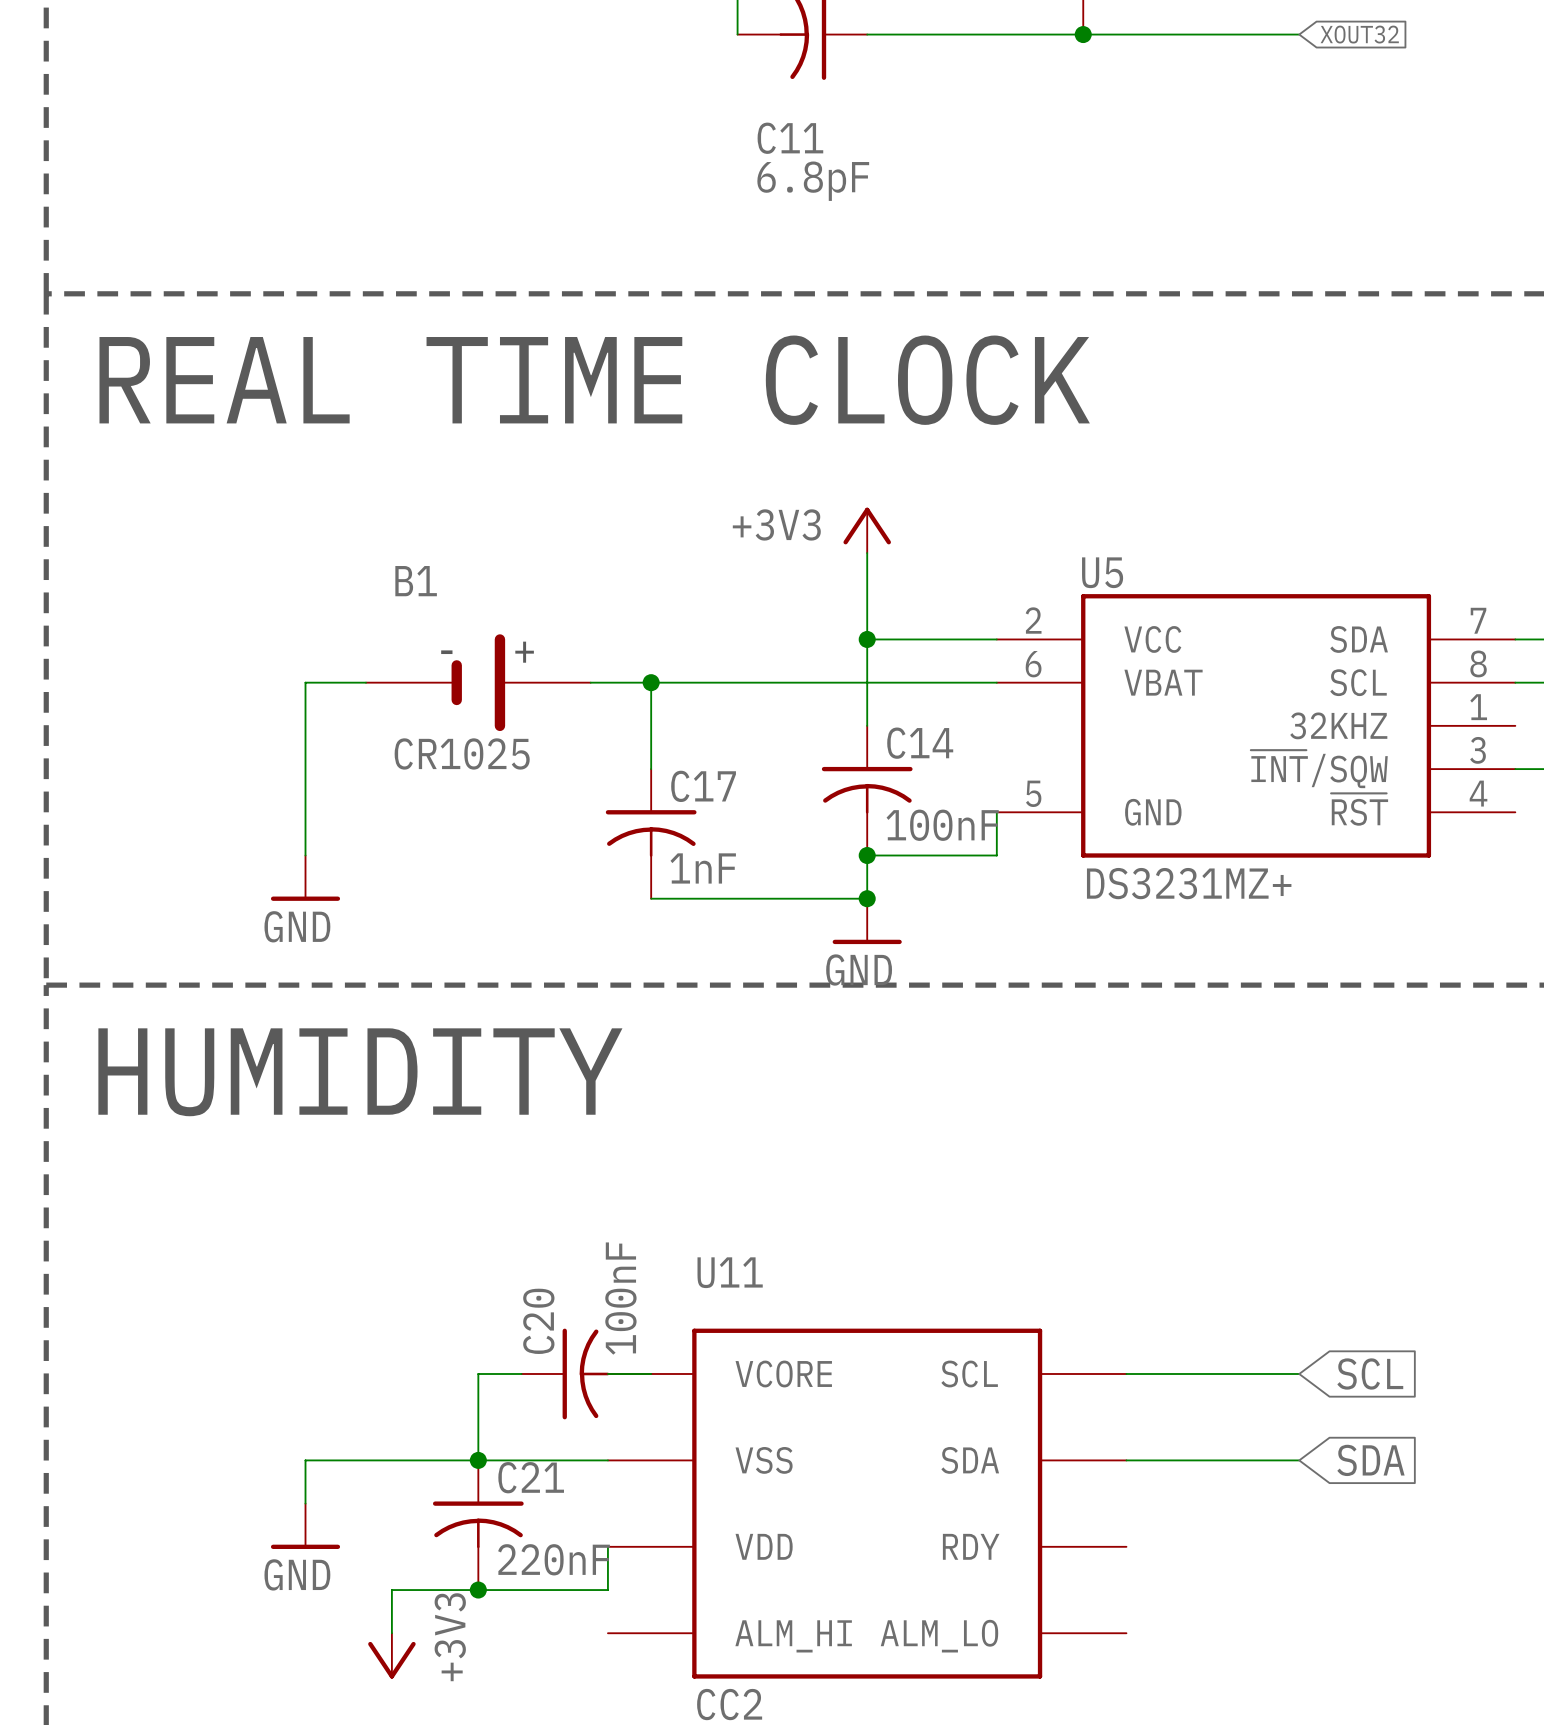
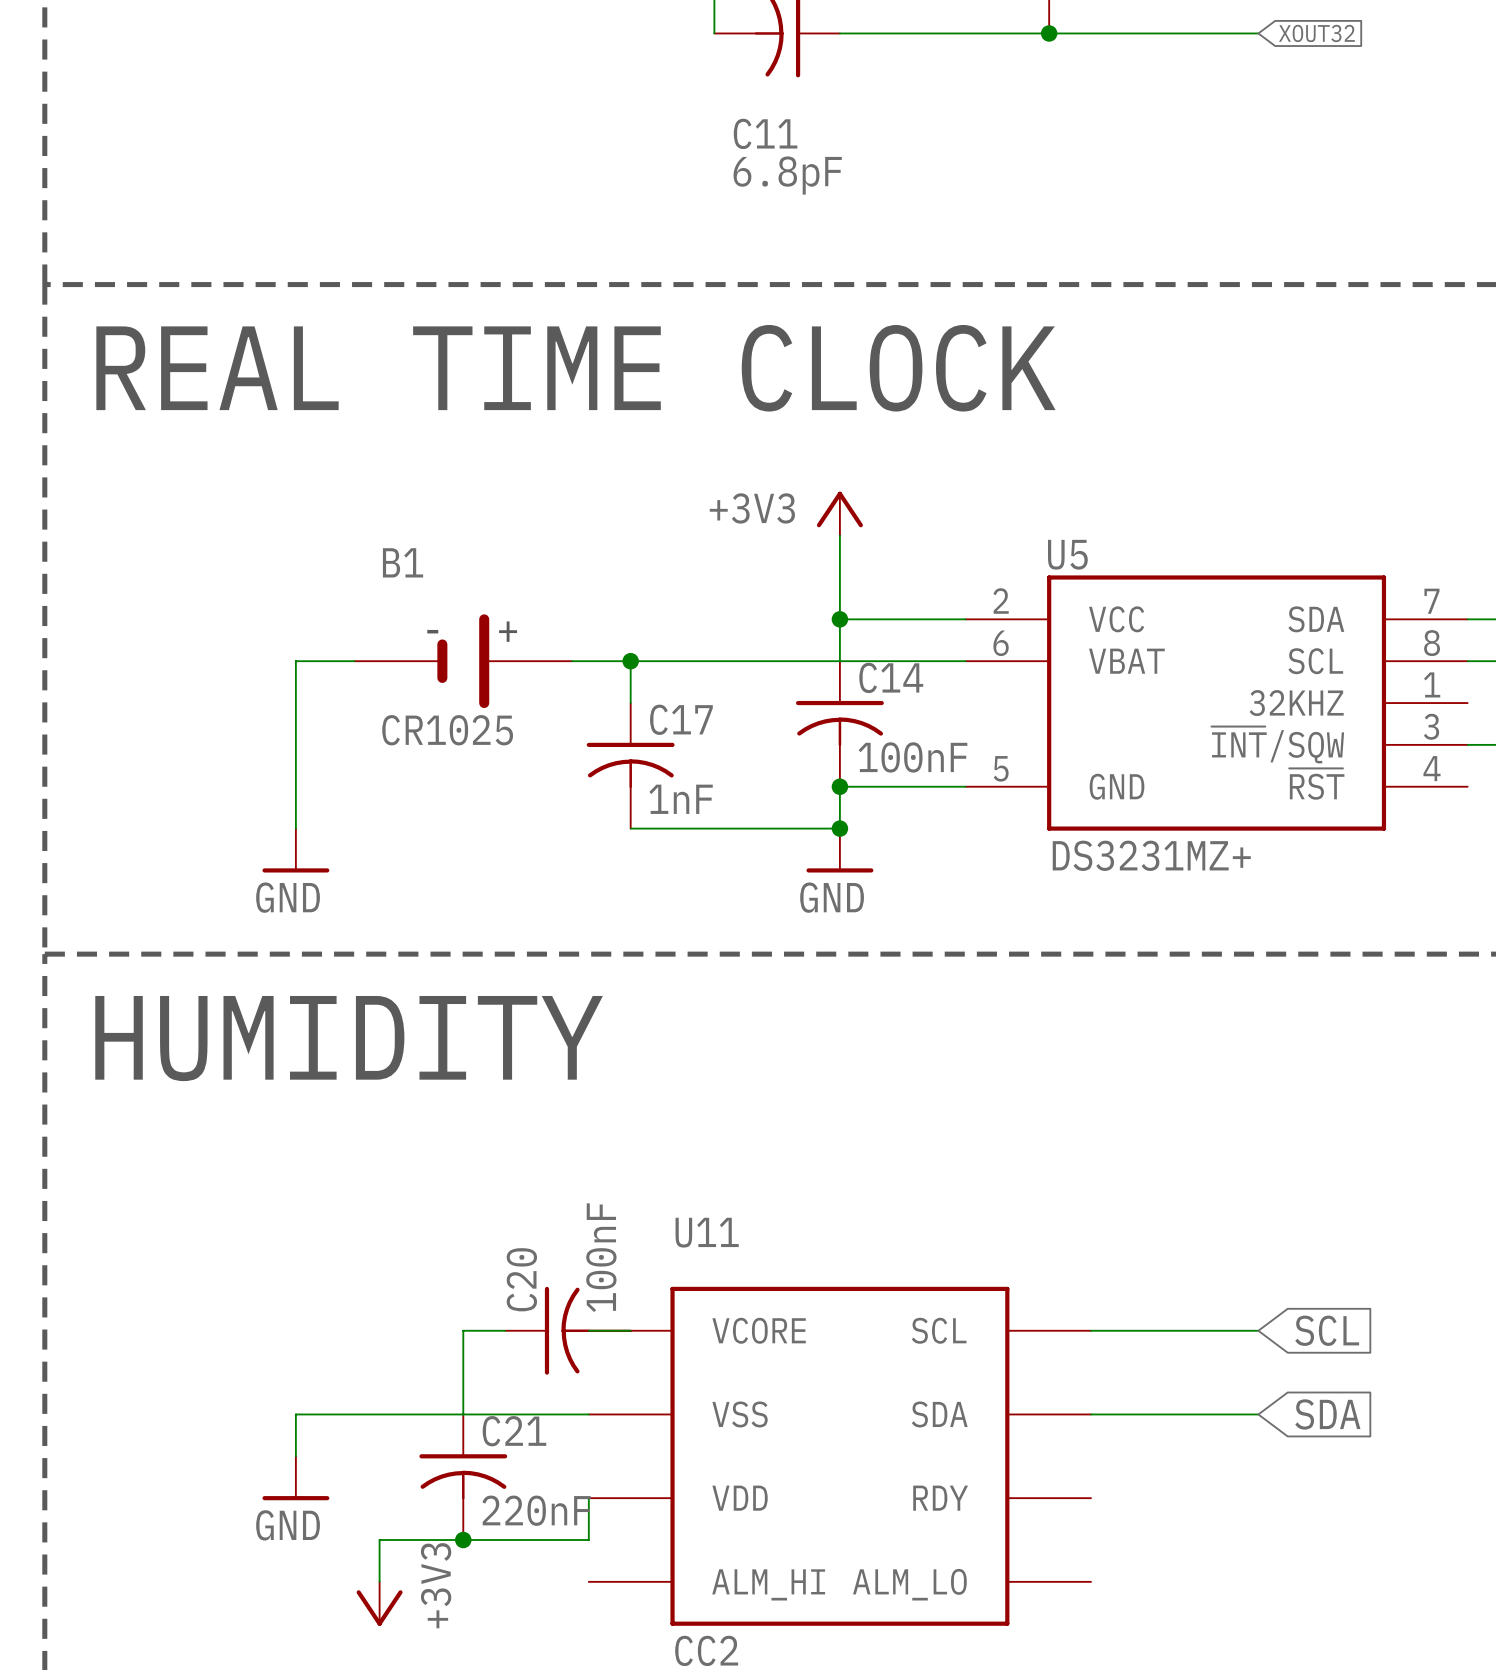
C14 position: (867, 790) -> (839, 723)
wire: (996, 812) (996, 855) (867, 855) (867, 898) (651, 898) -> (965, 786) (839, 786) (839, 828) (630, 828)
C17 position: (651, 833) -> (630, 765)
junction position: (867, 898) -> (839, 786)
power symbol position: GND (867, 921) -> GND (839, 850)
junction: (478, 1460) -> none

